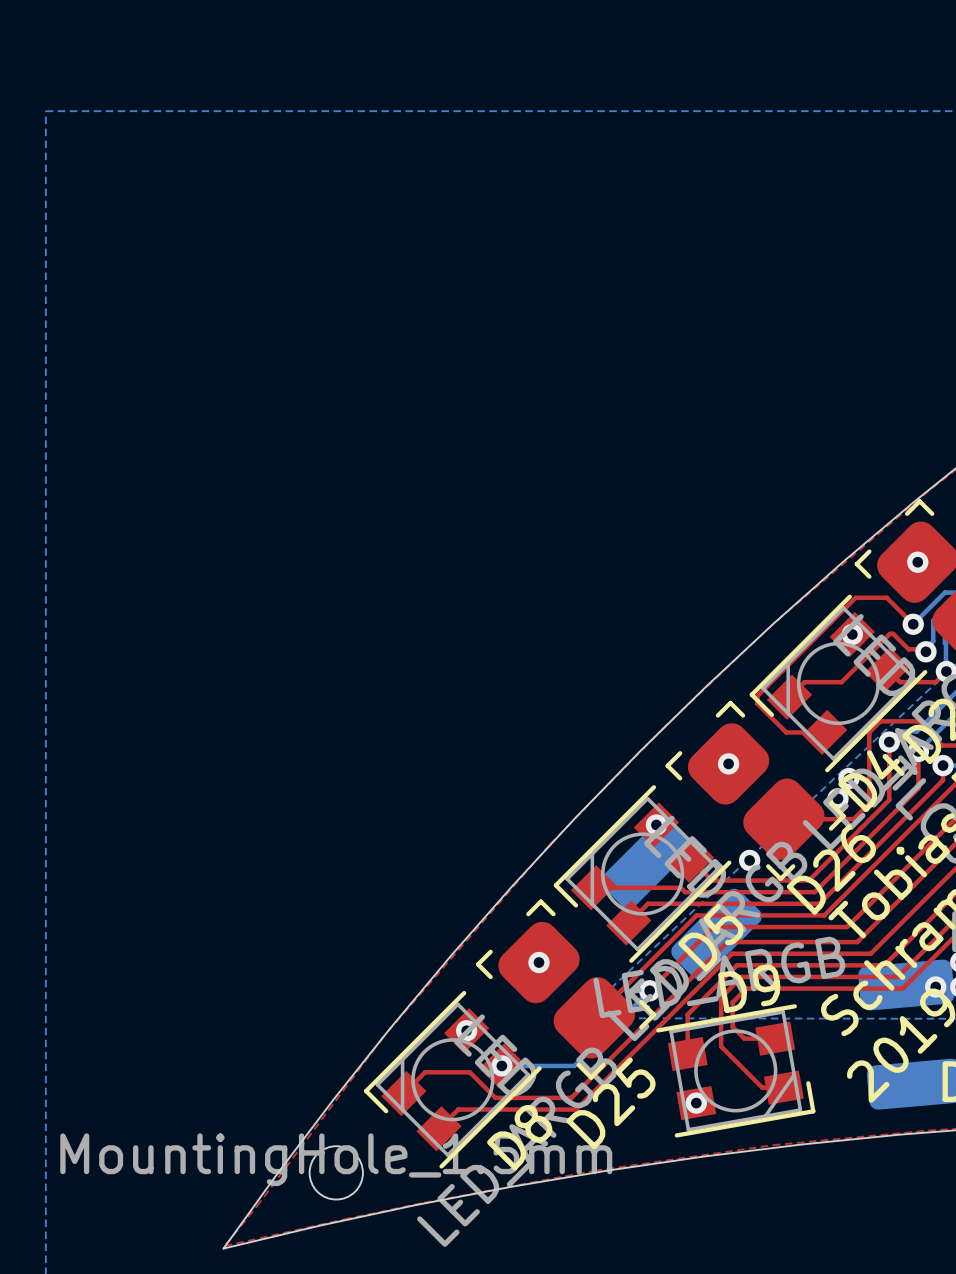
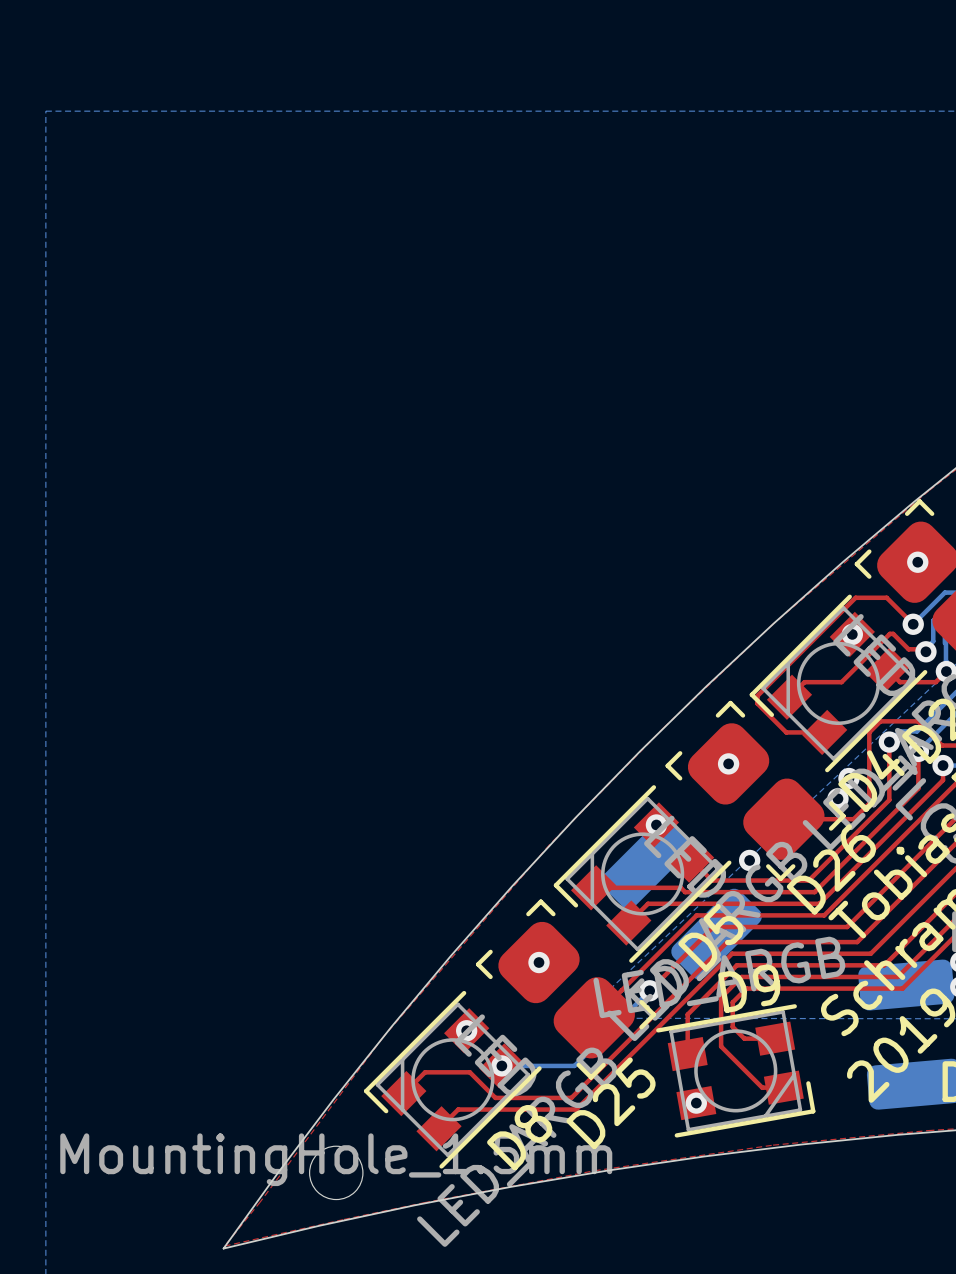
via: (935, 986) -> none

